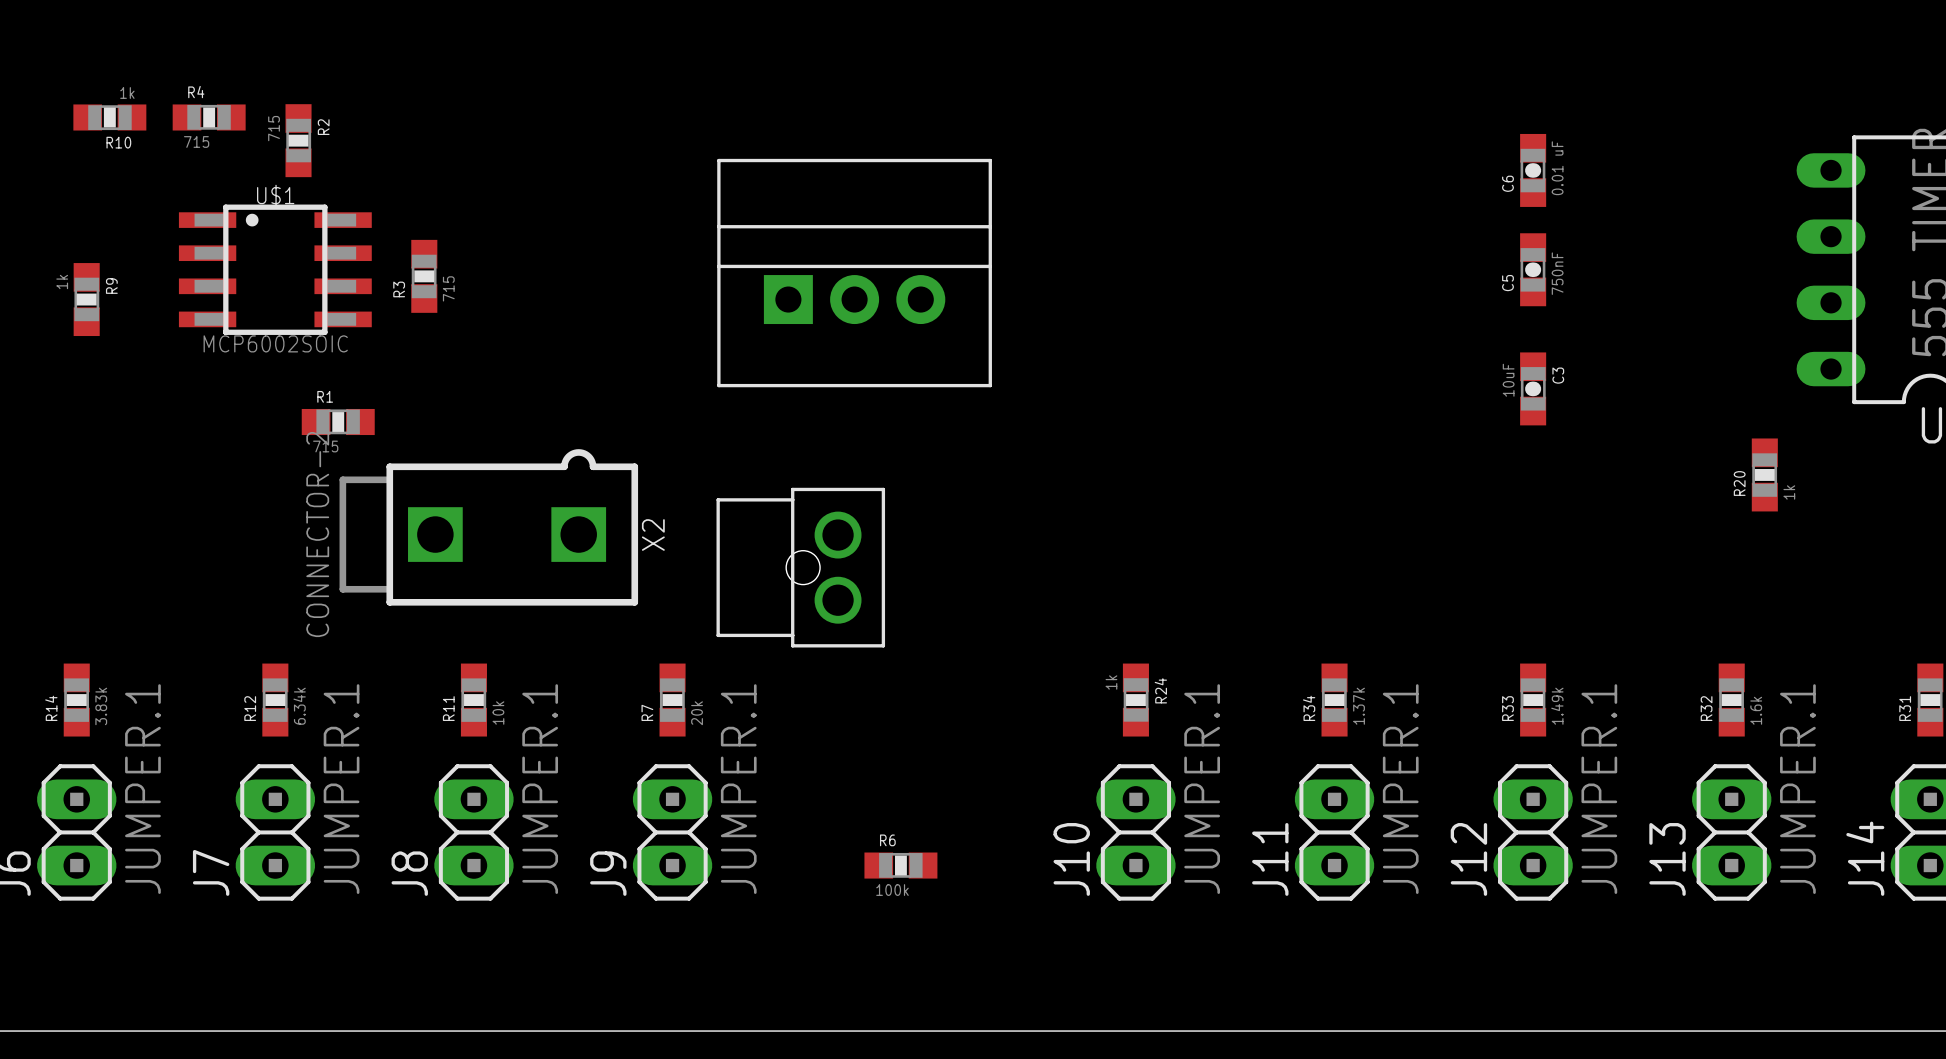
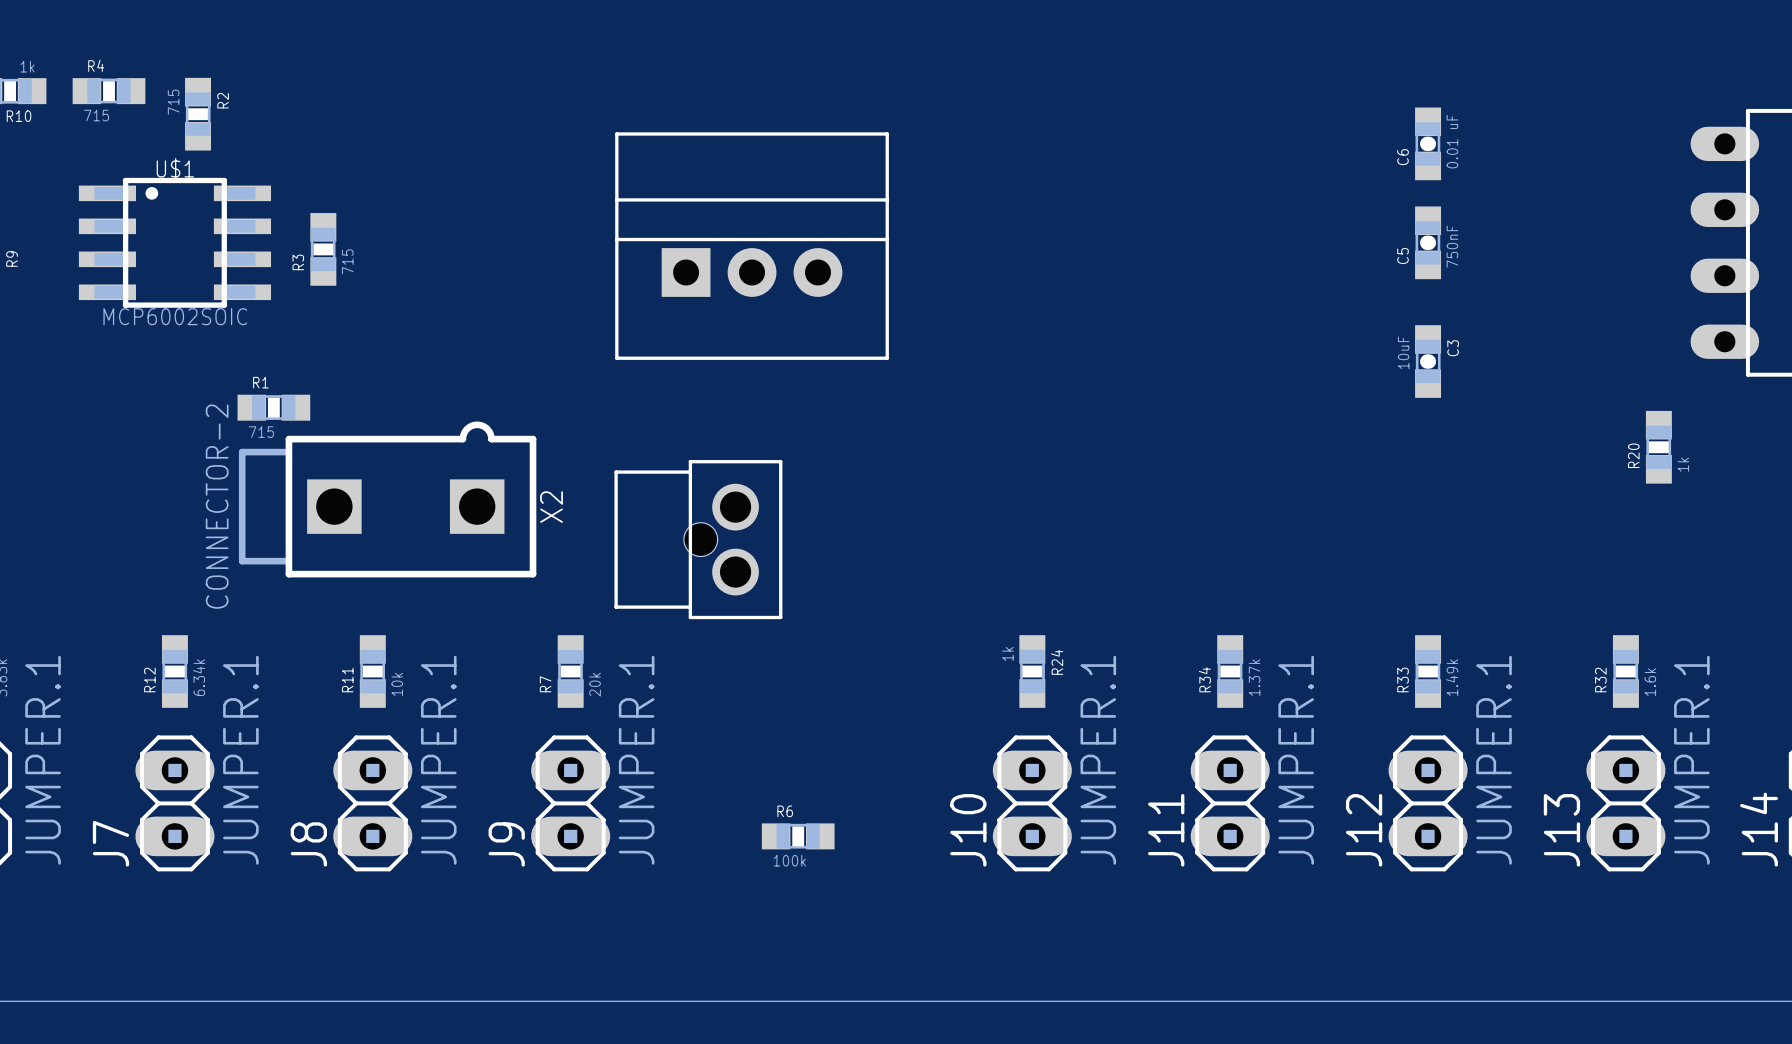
R1 position: (338, 422) -> (273, 407)

